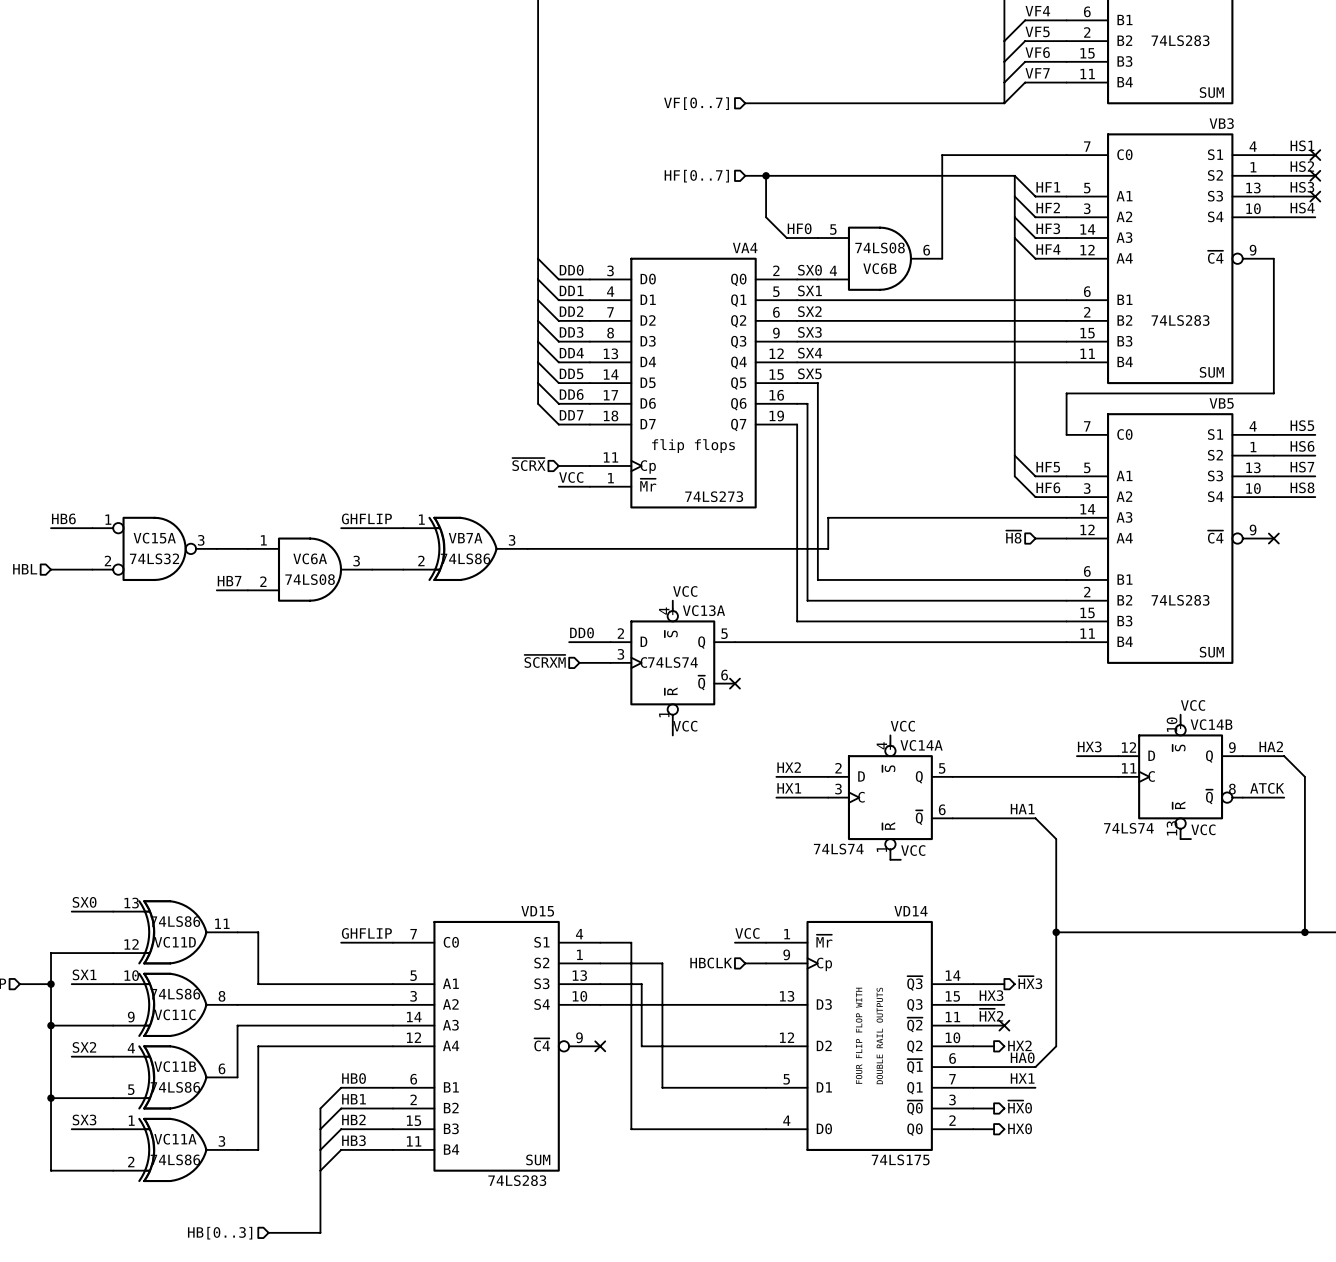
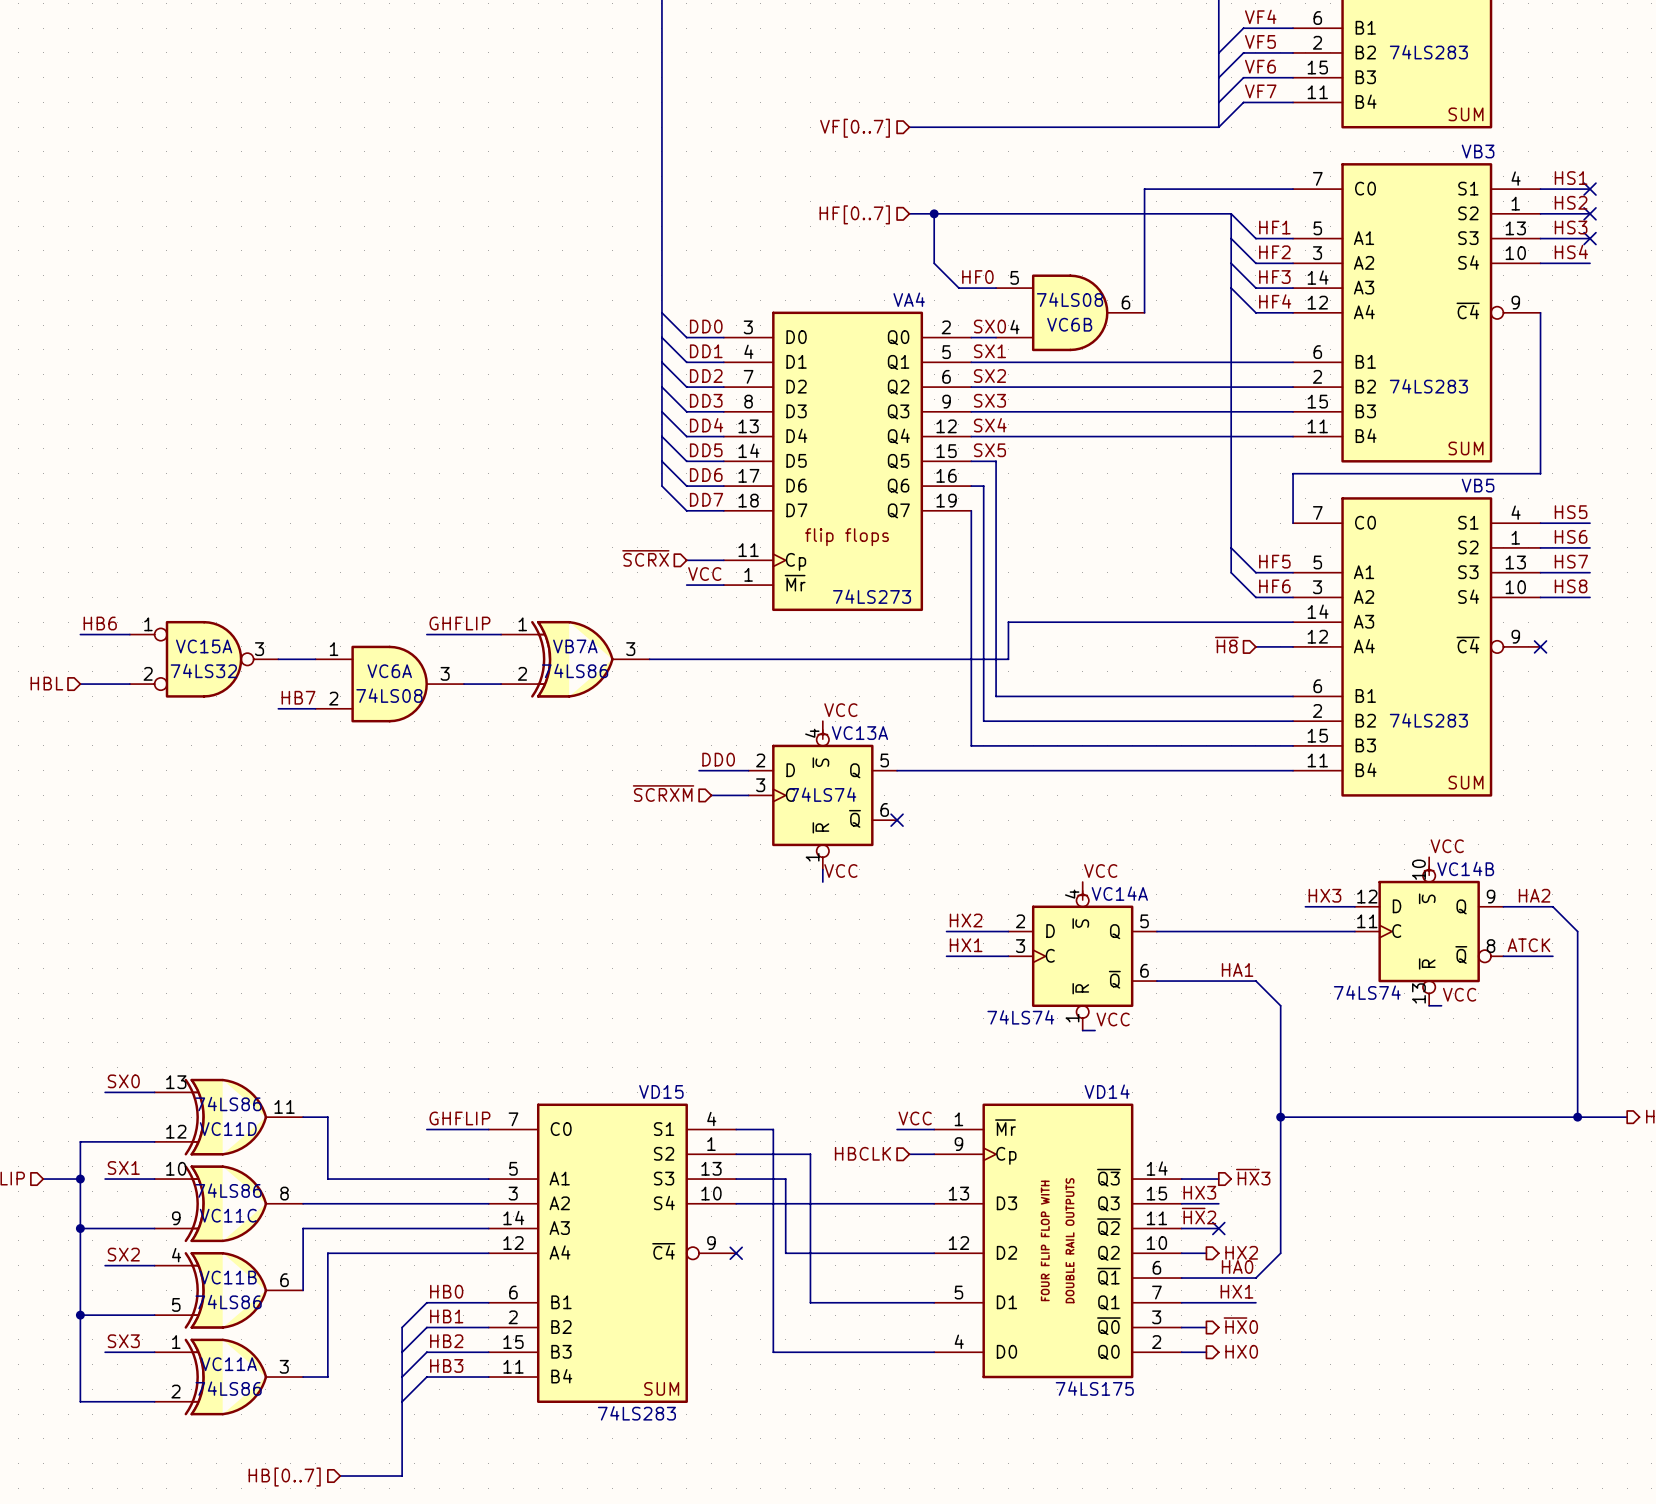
hierarchical label: HB[0..3] (220, 1233) -> HB[0..7] (284, 1477)

